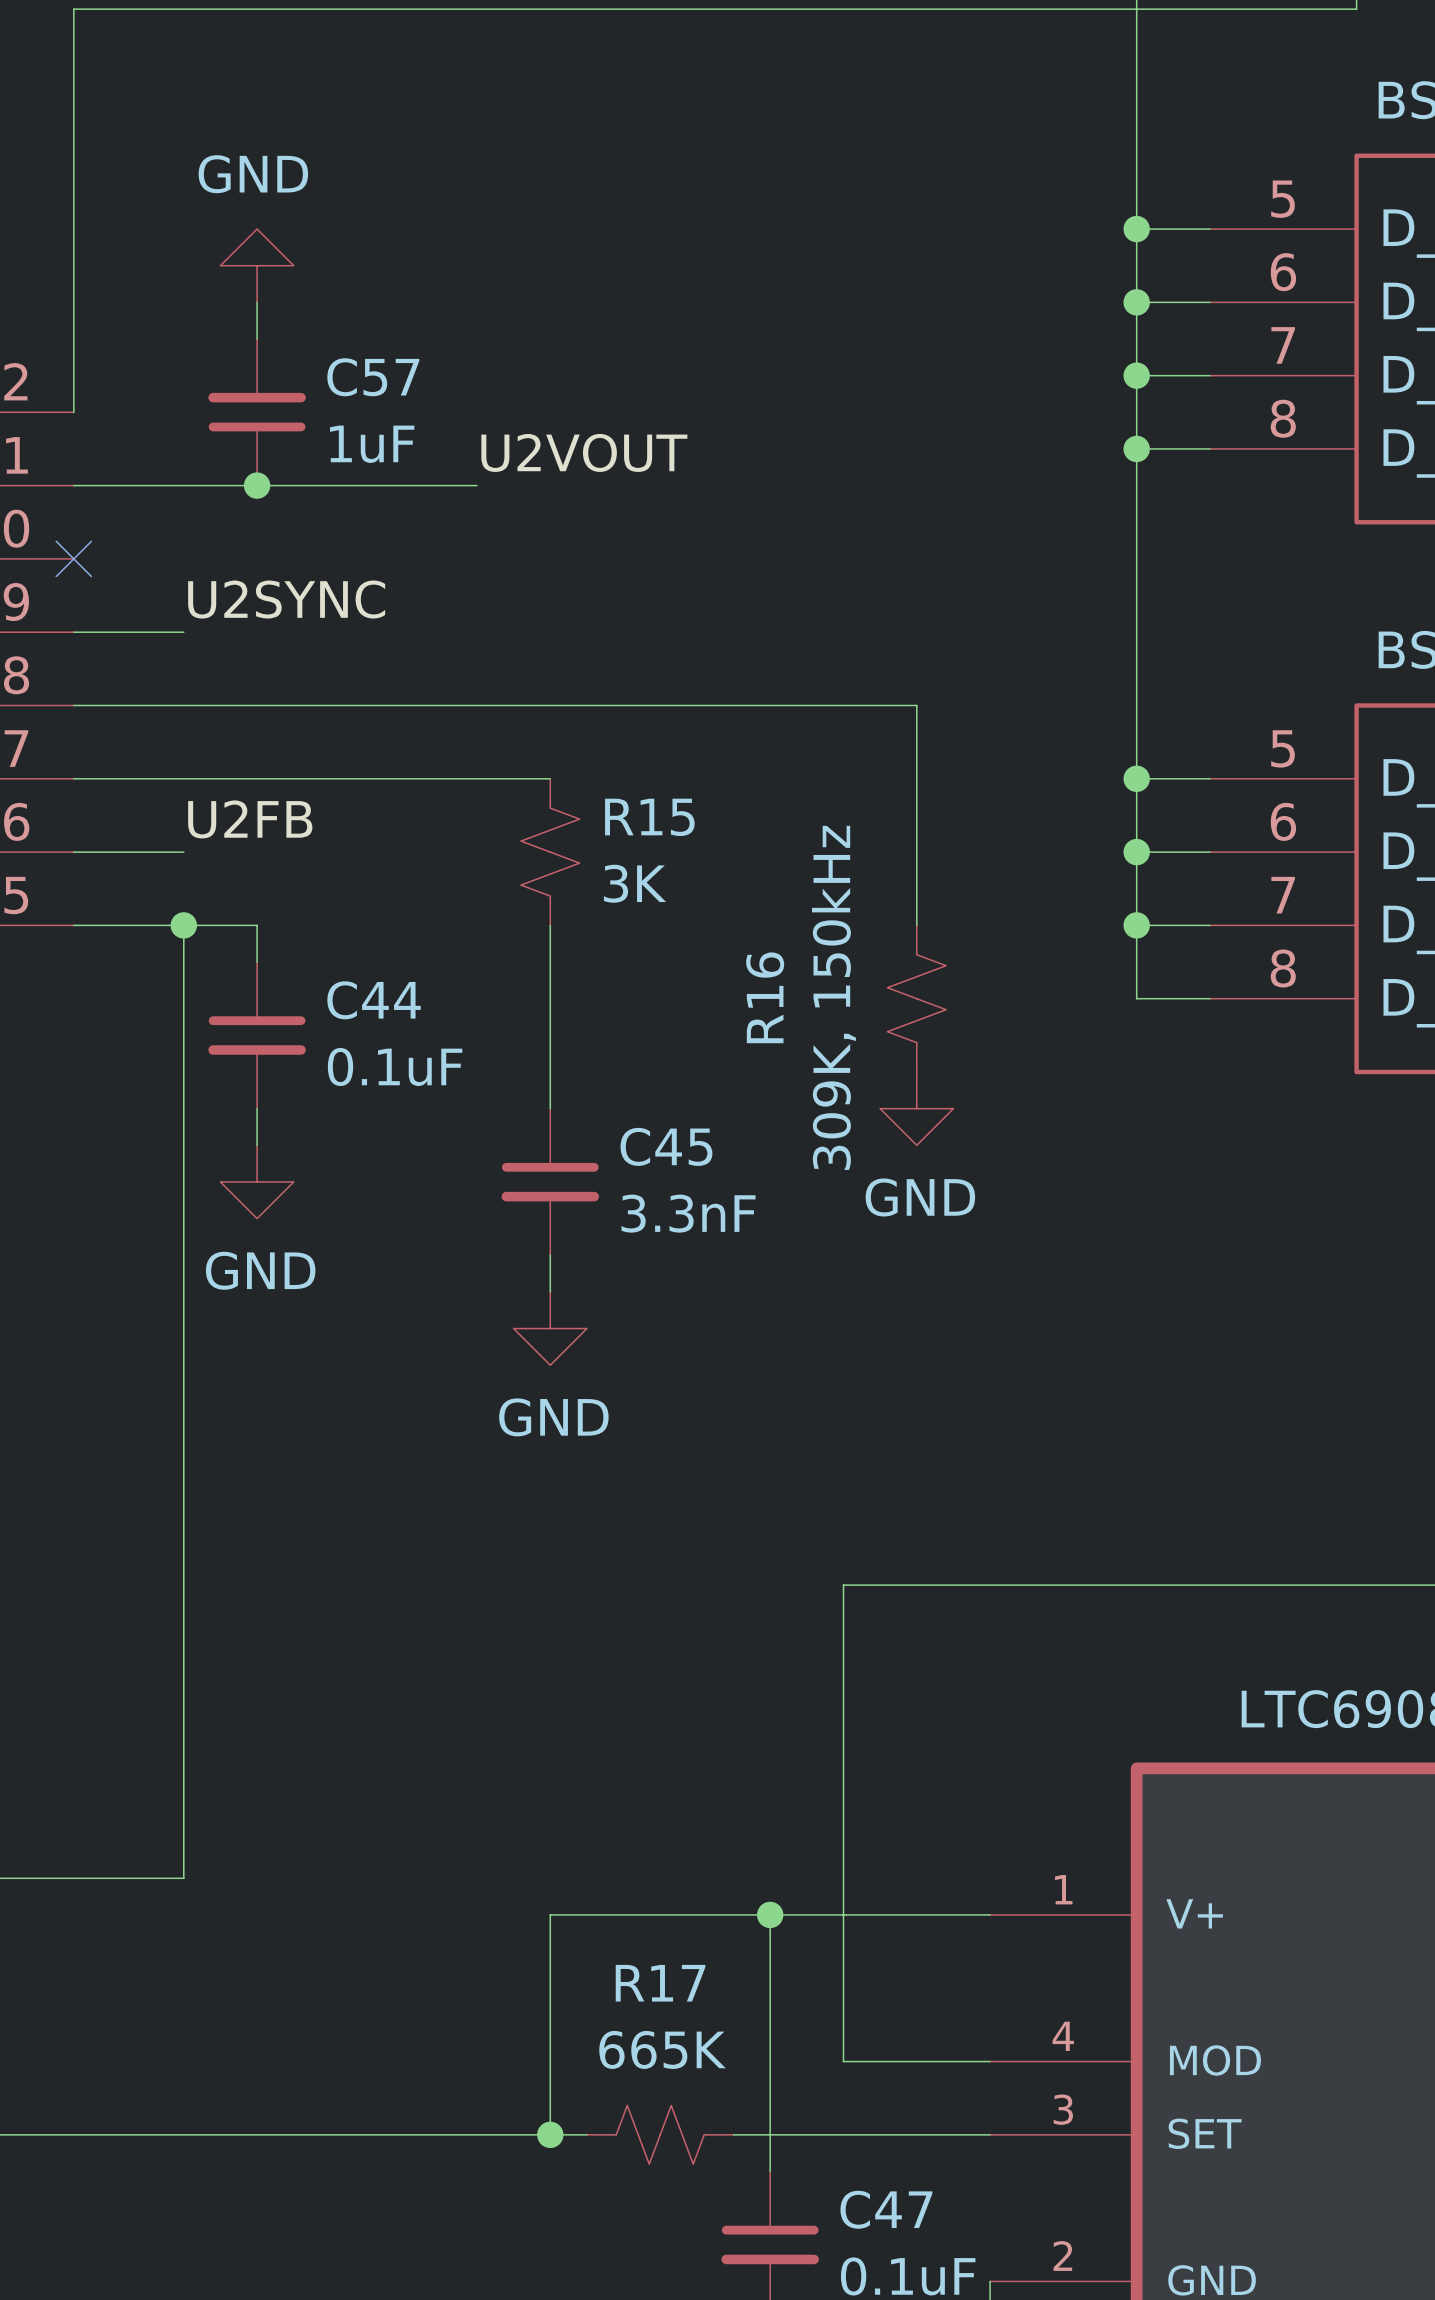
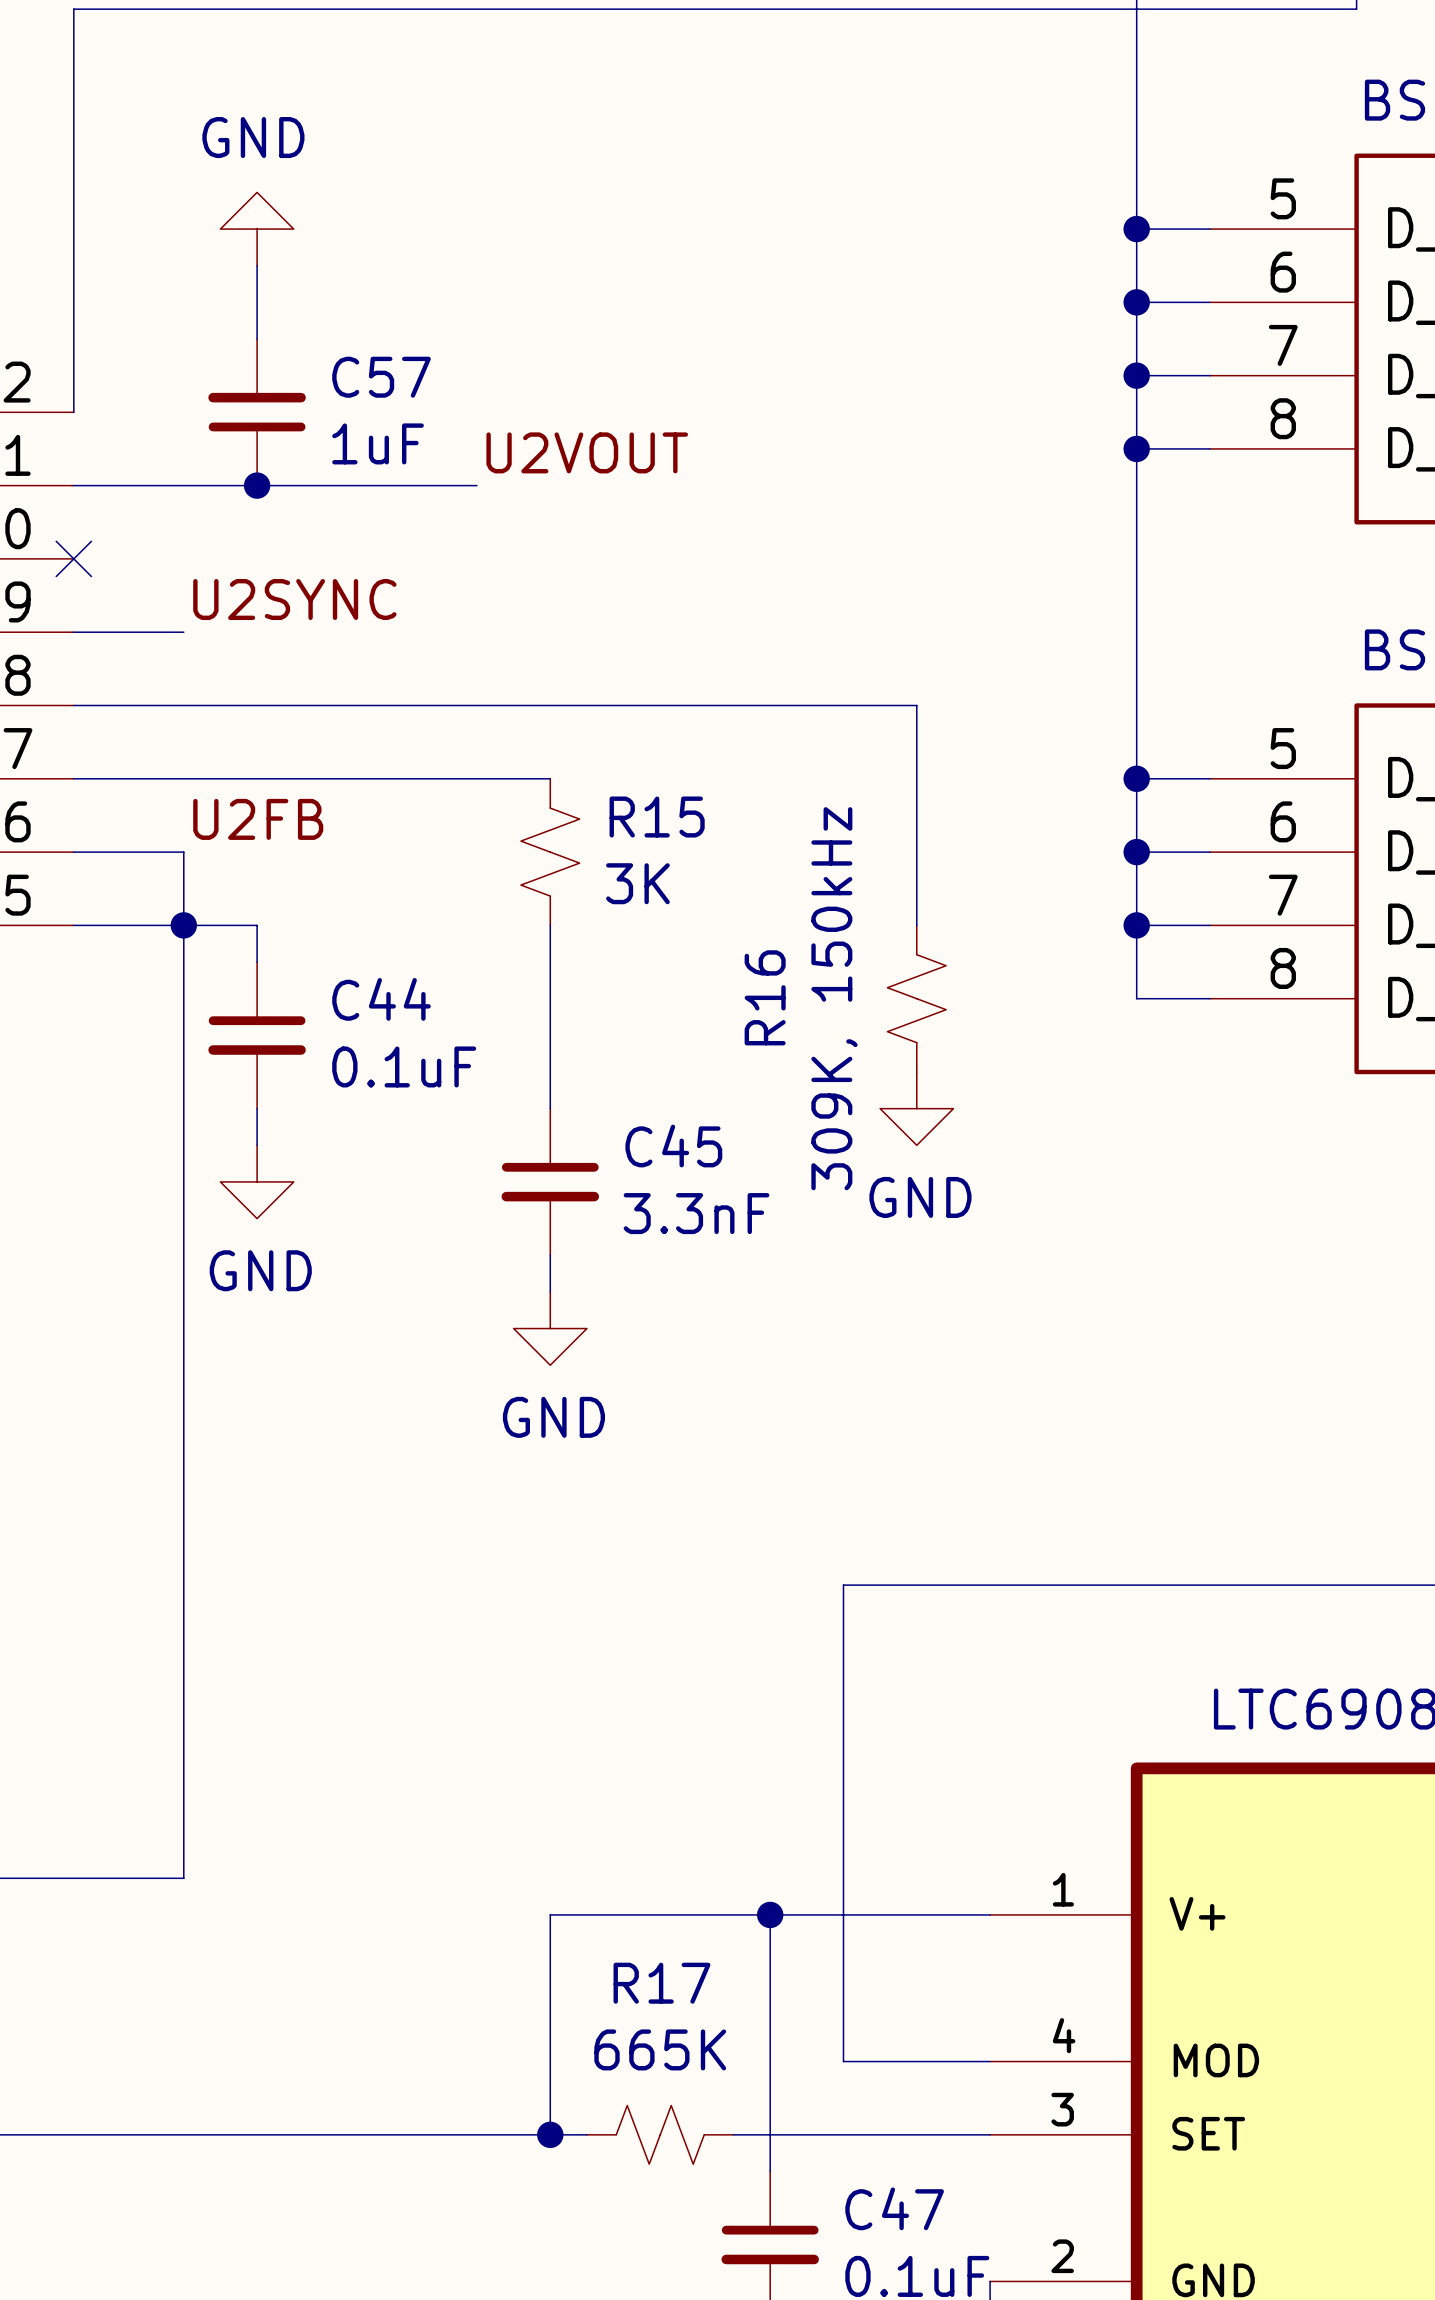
power symbol position: GND (257, 265) -> GND (257, 229)
wire: none -> (183, 852) (183, 925)

